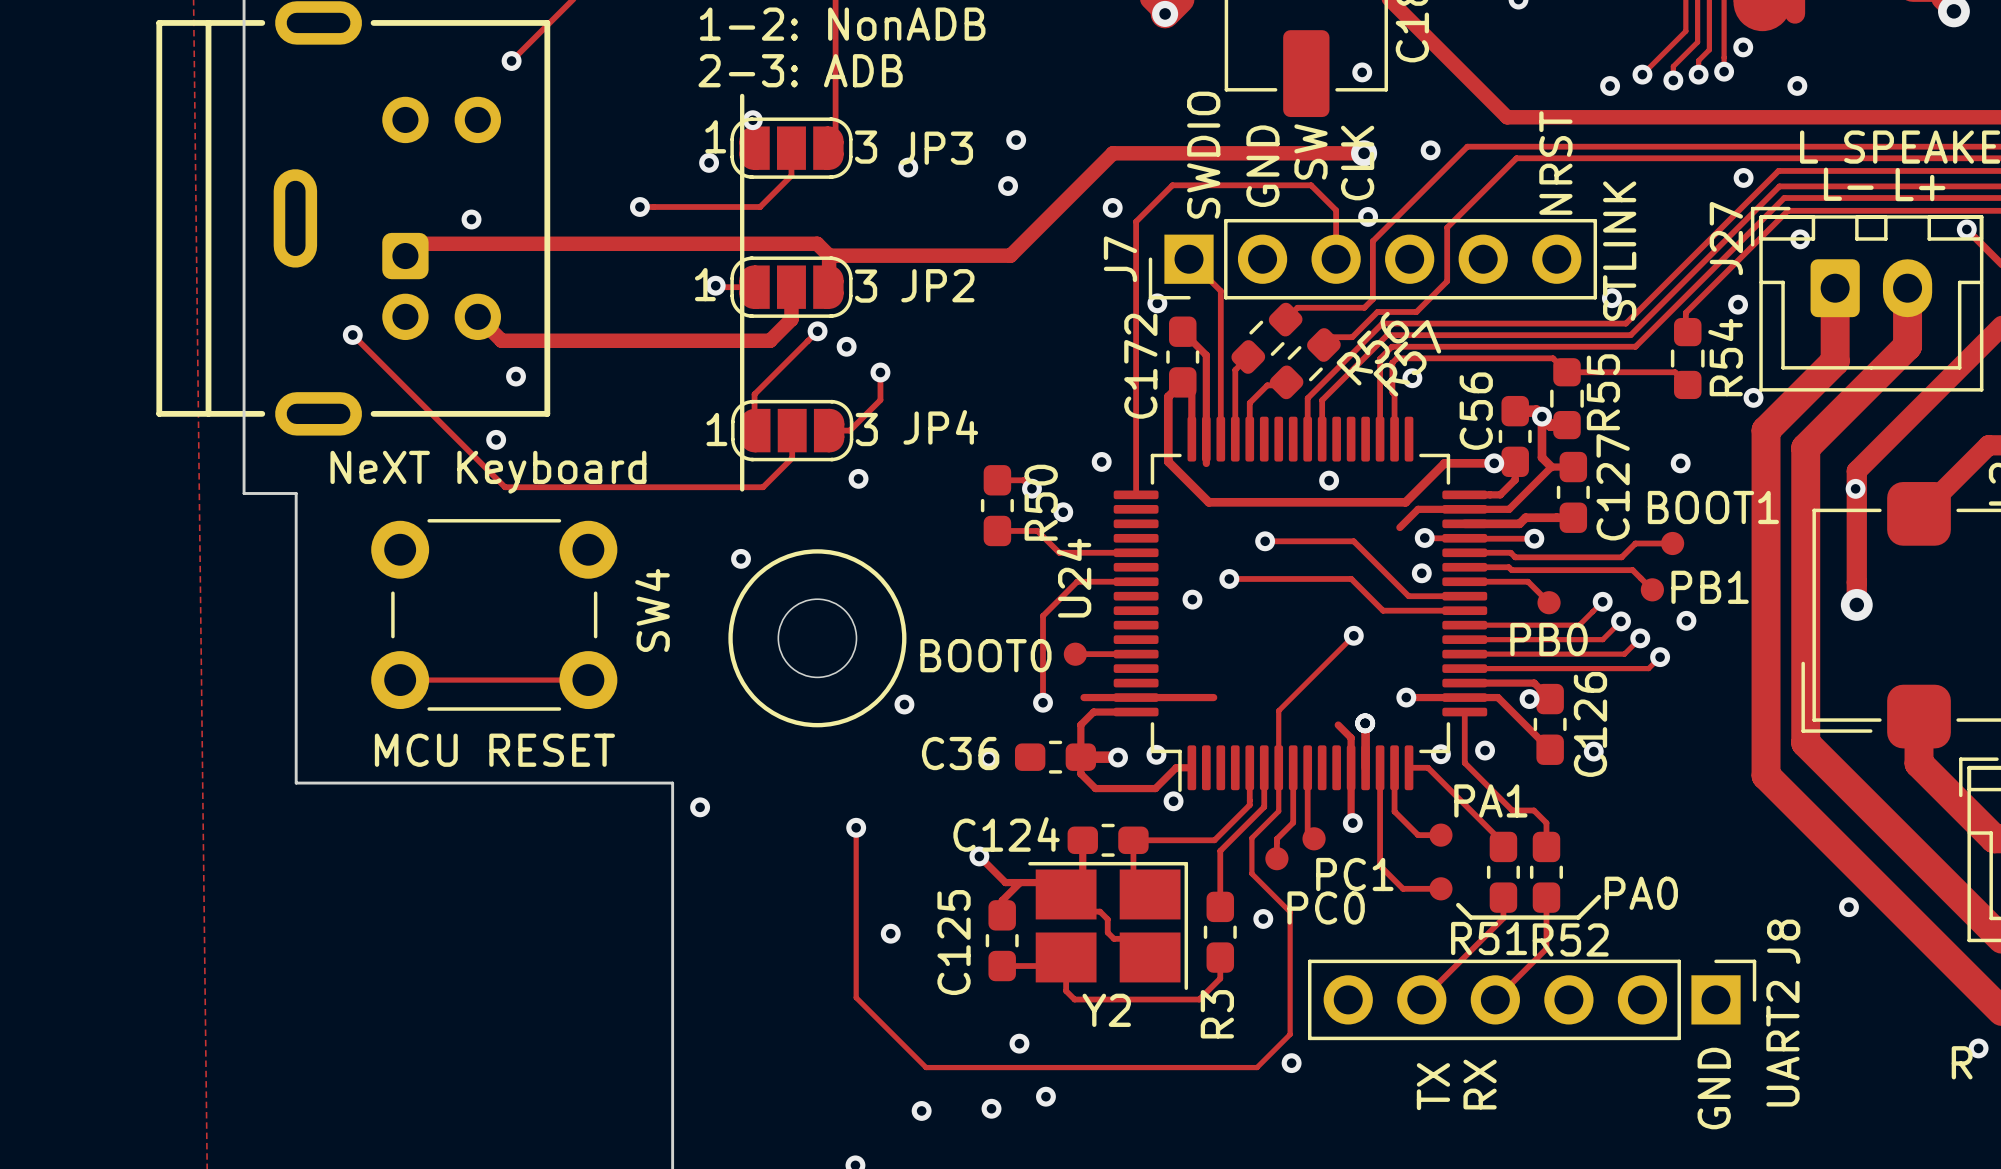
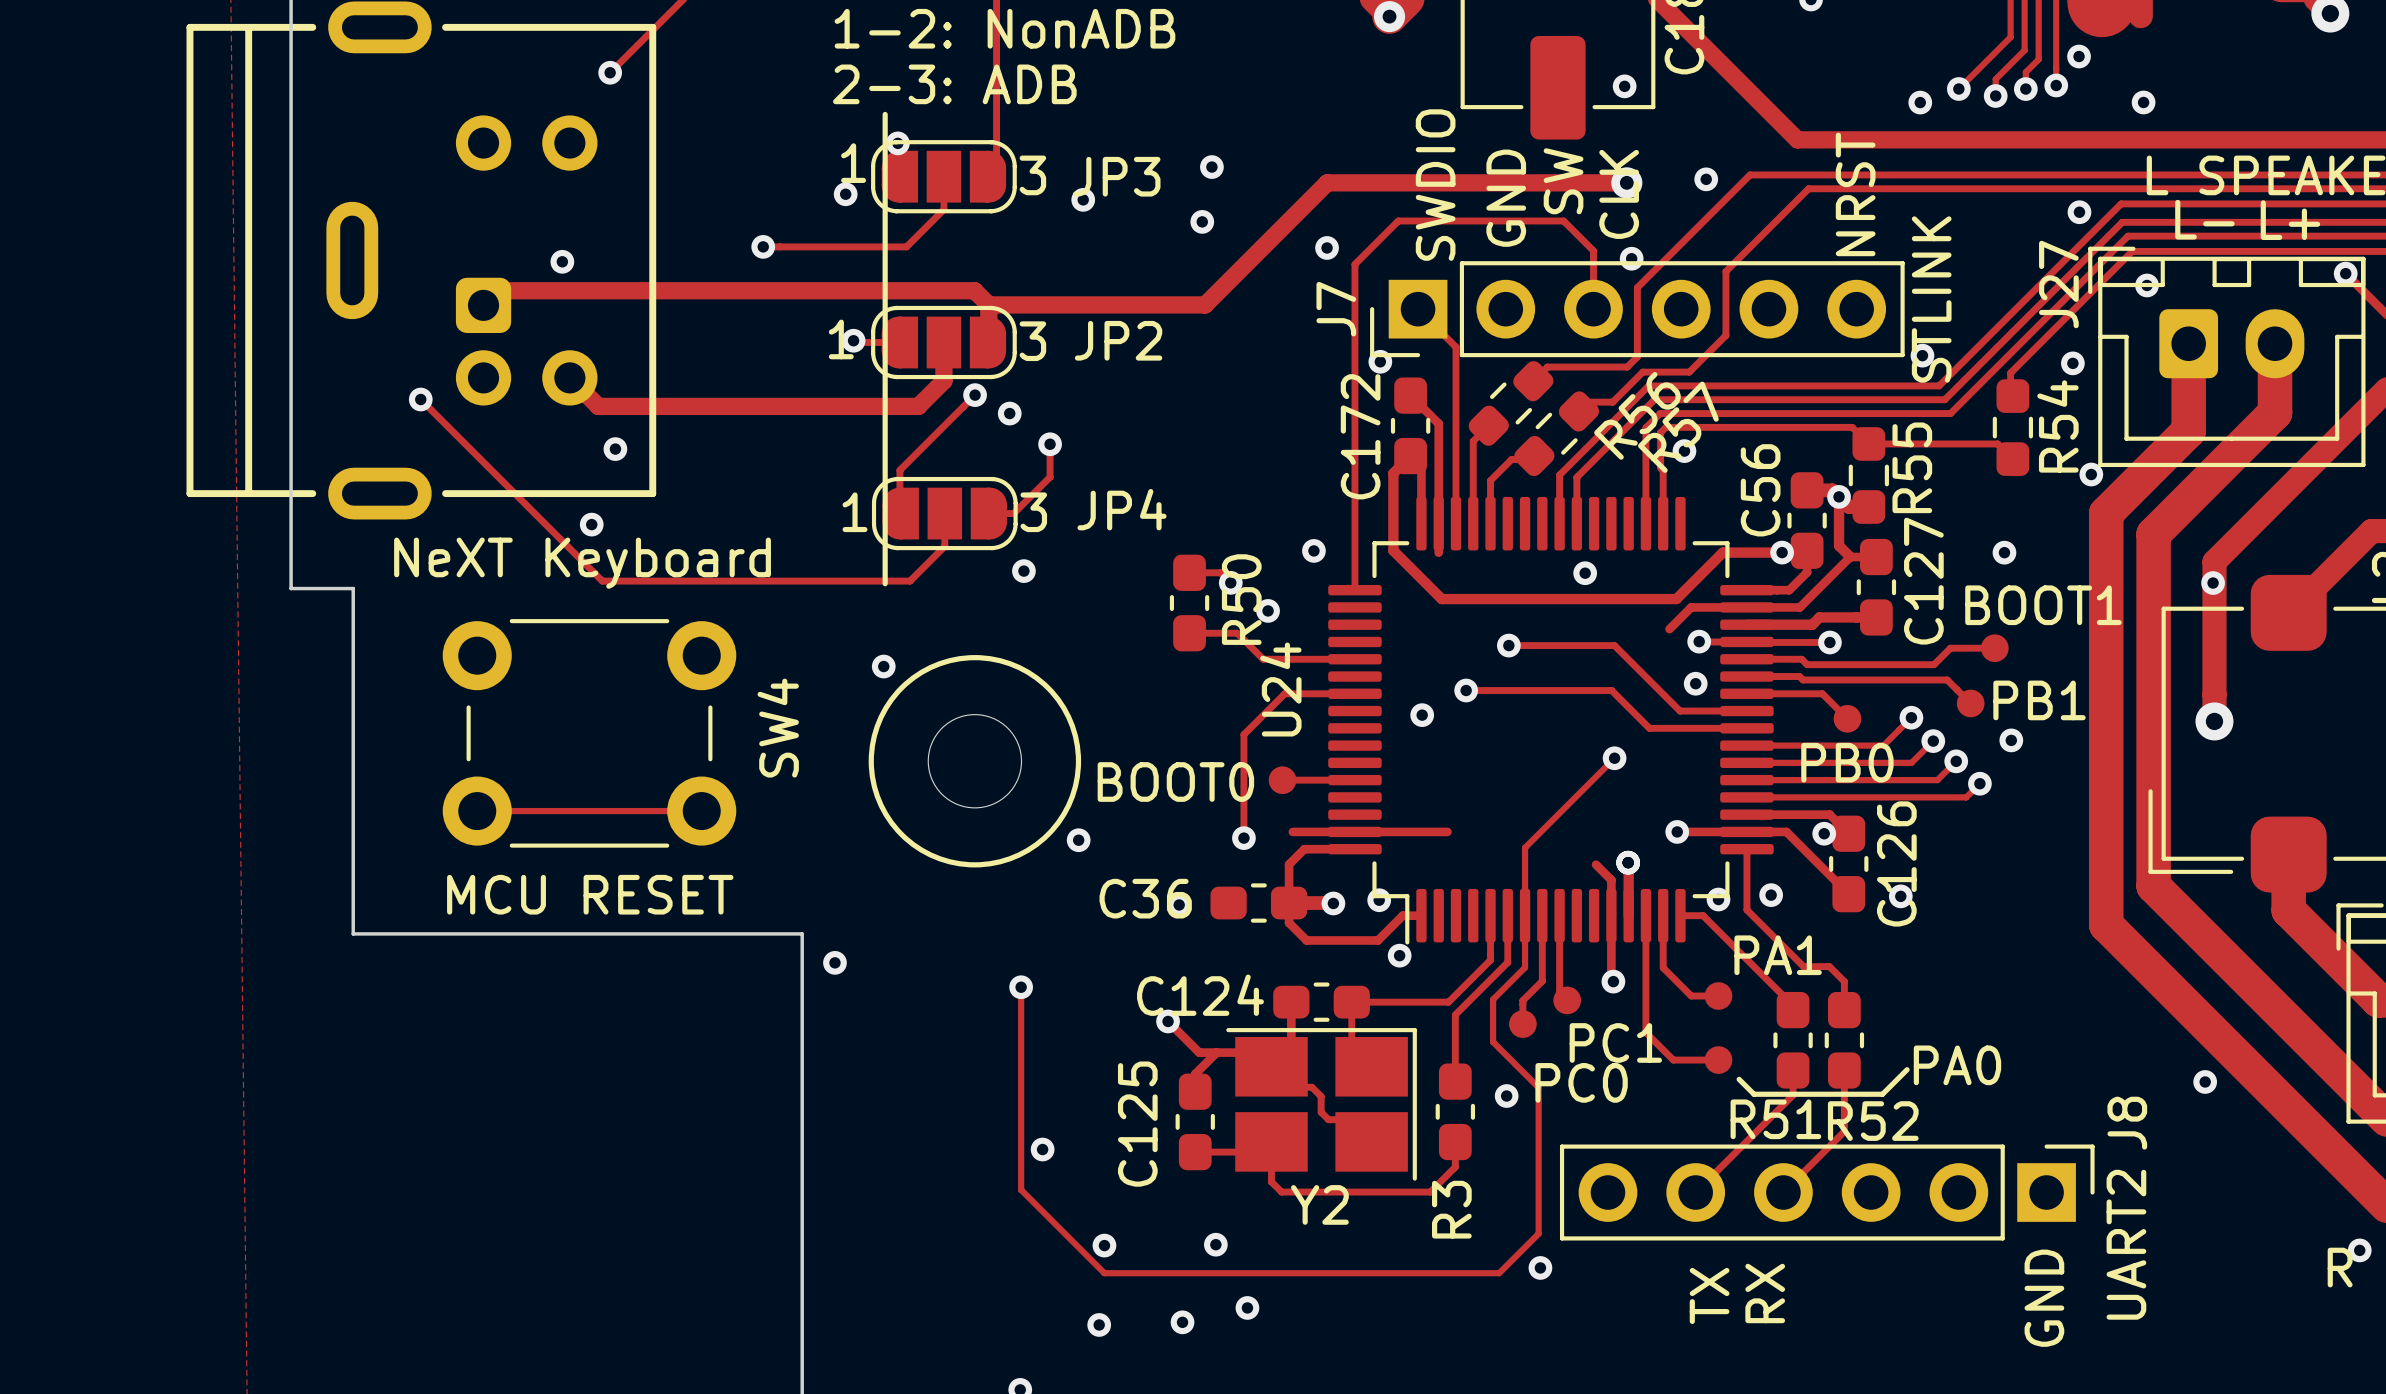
via position: (890, 933) -> (1042, 1149)
via: none -> (1104, 1245)

